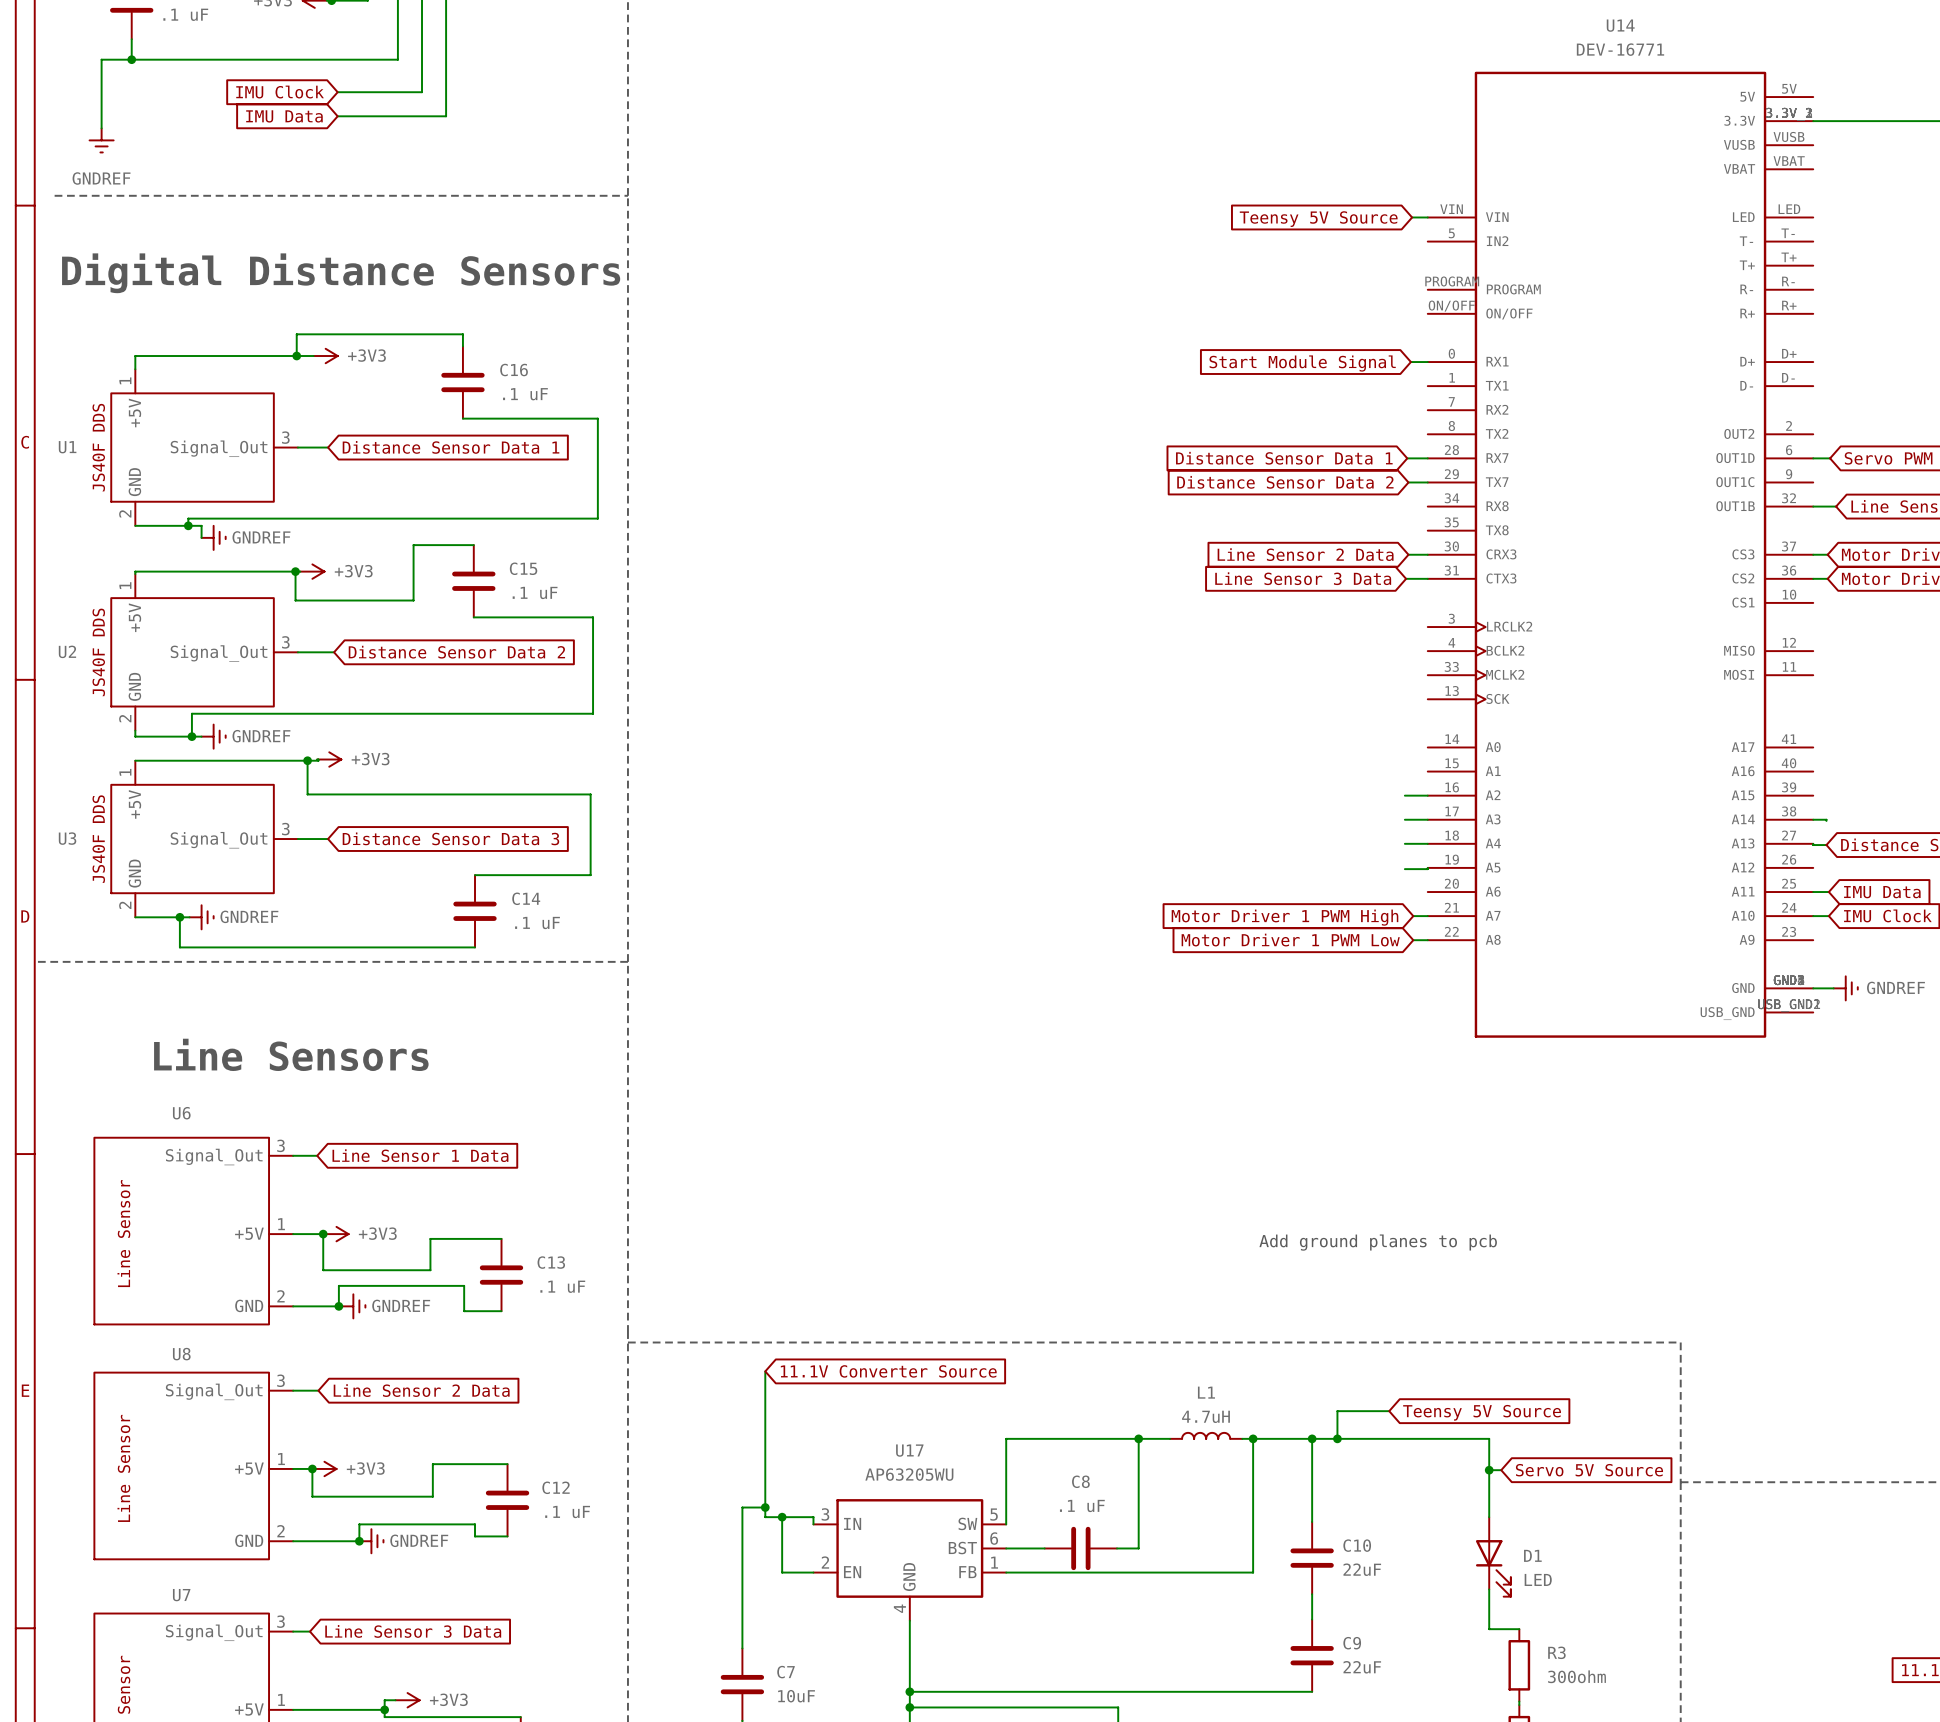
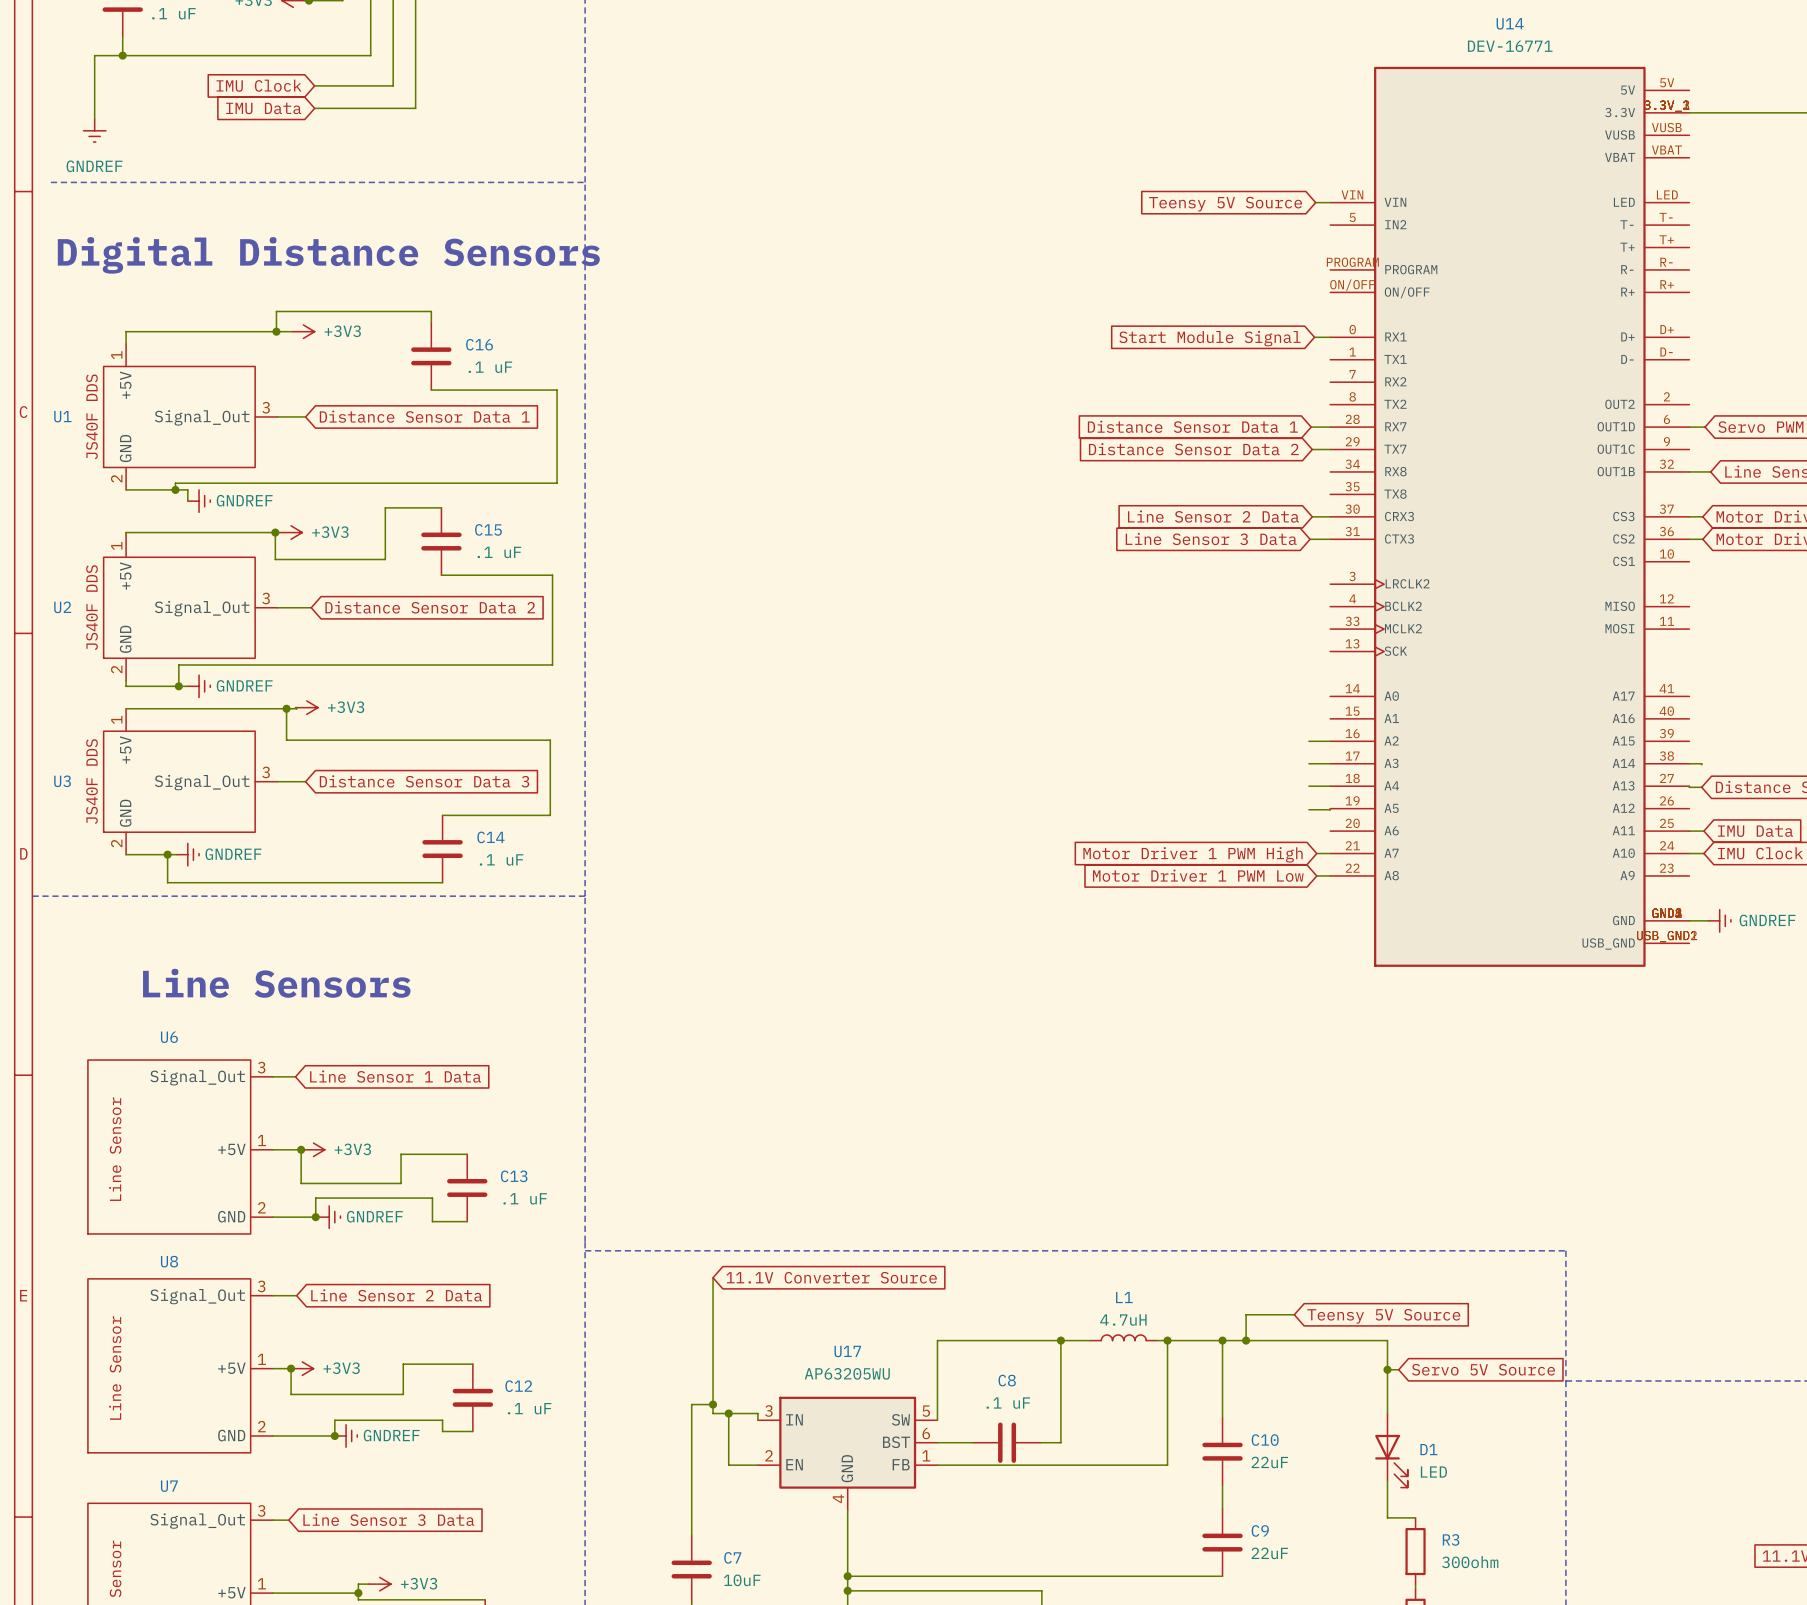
text: Add ground planes to pcb (1378, 1242) -> none

